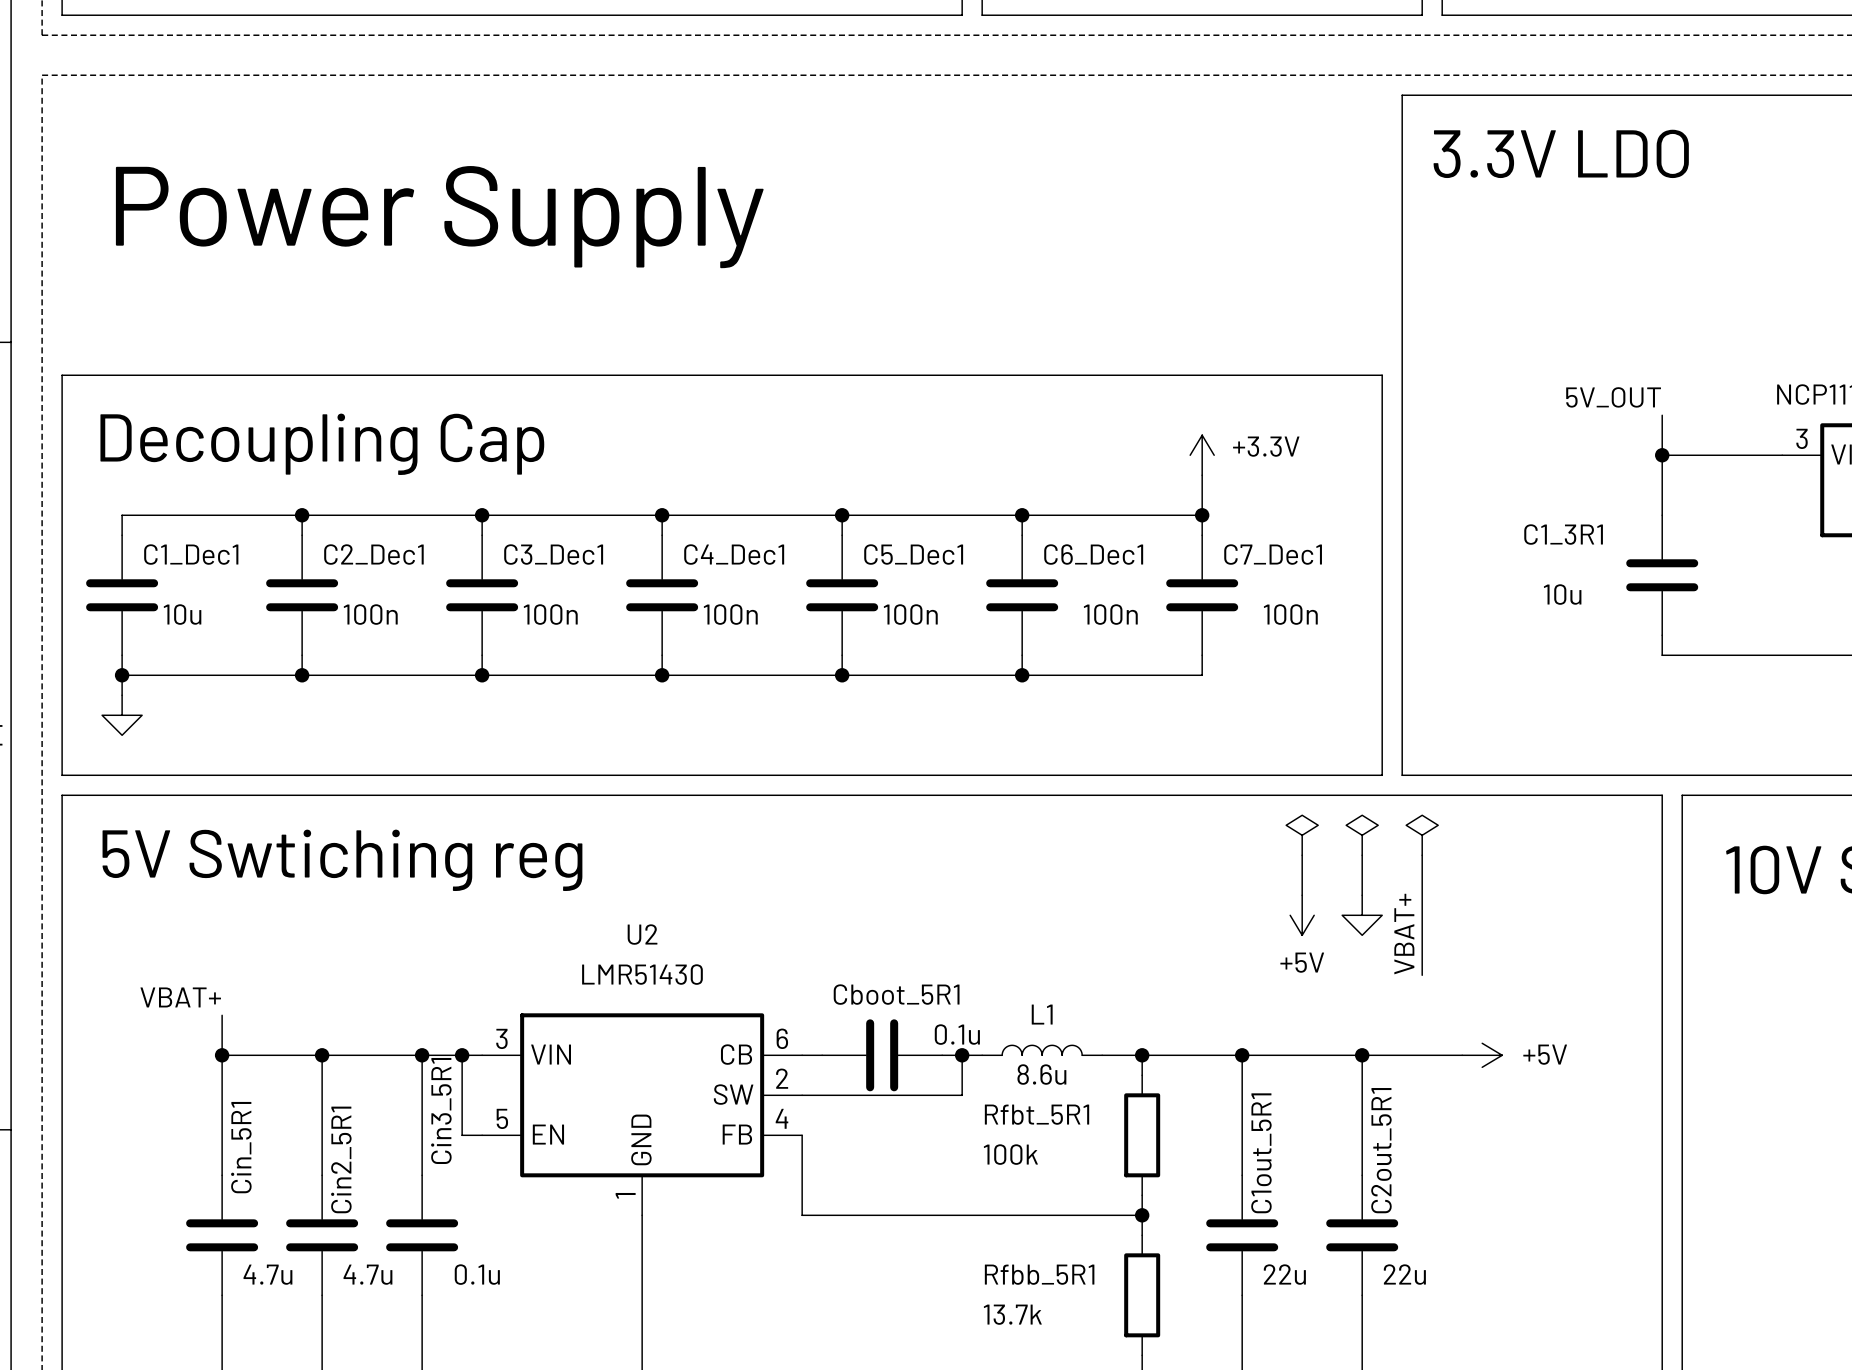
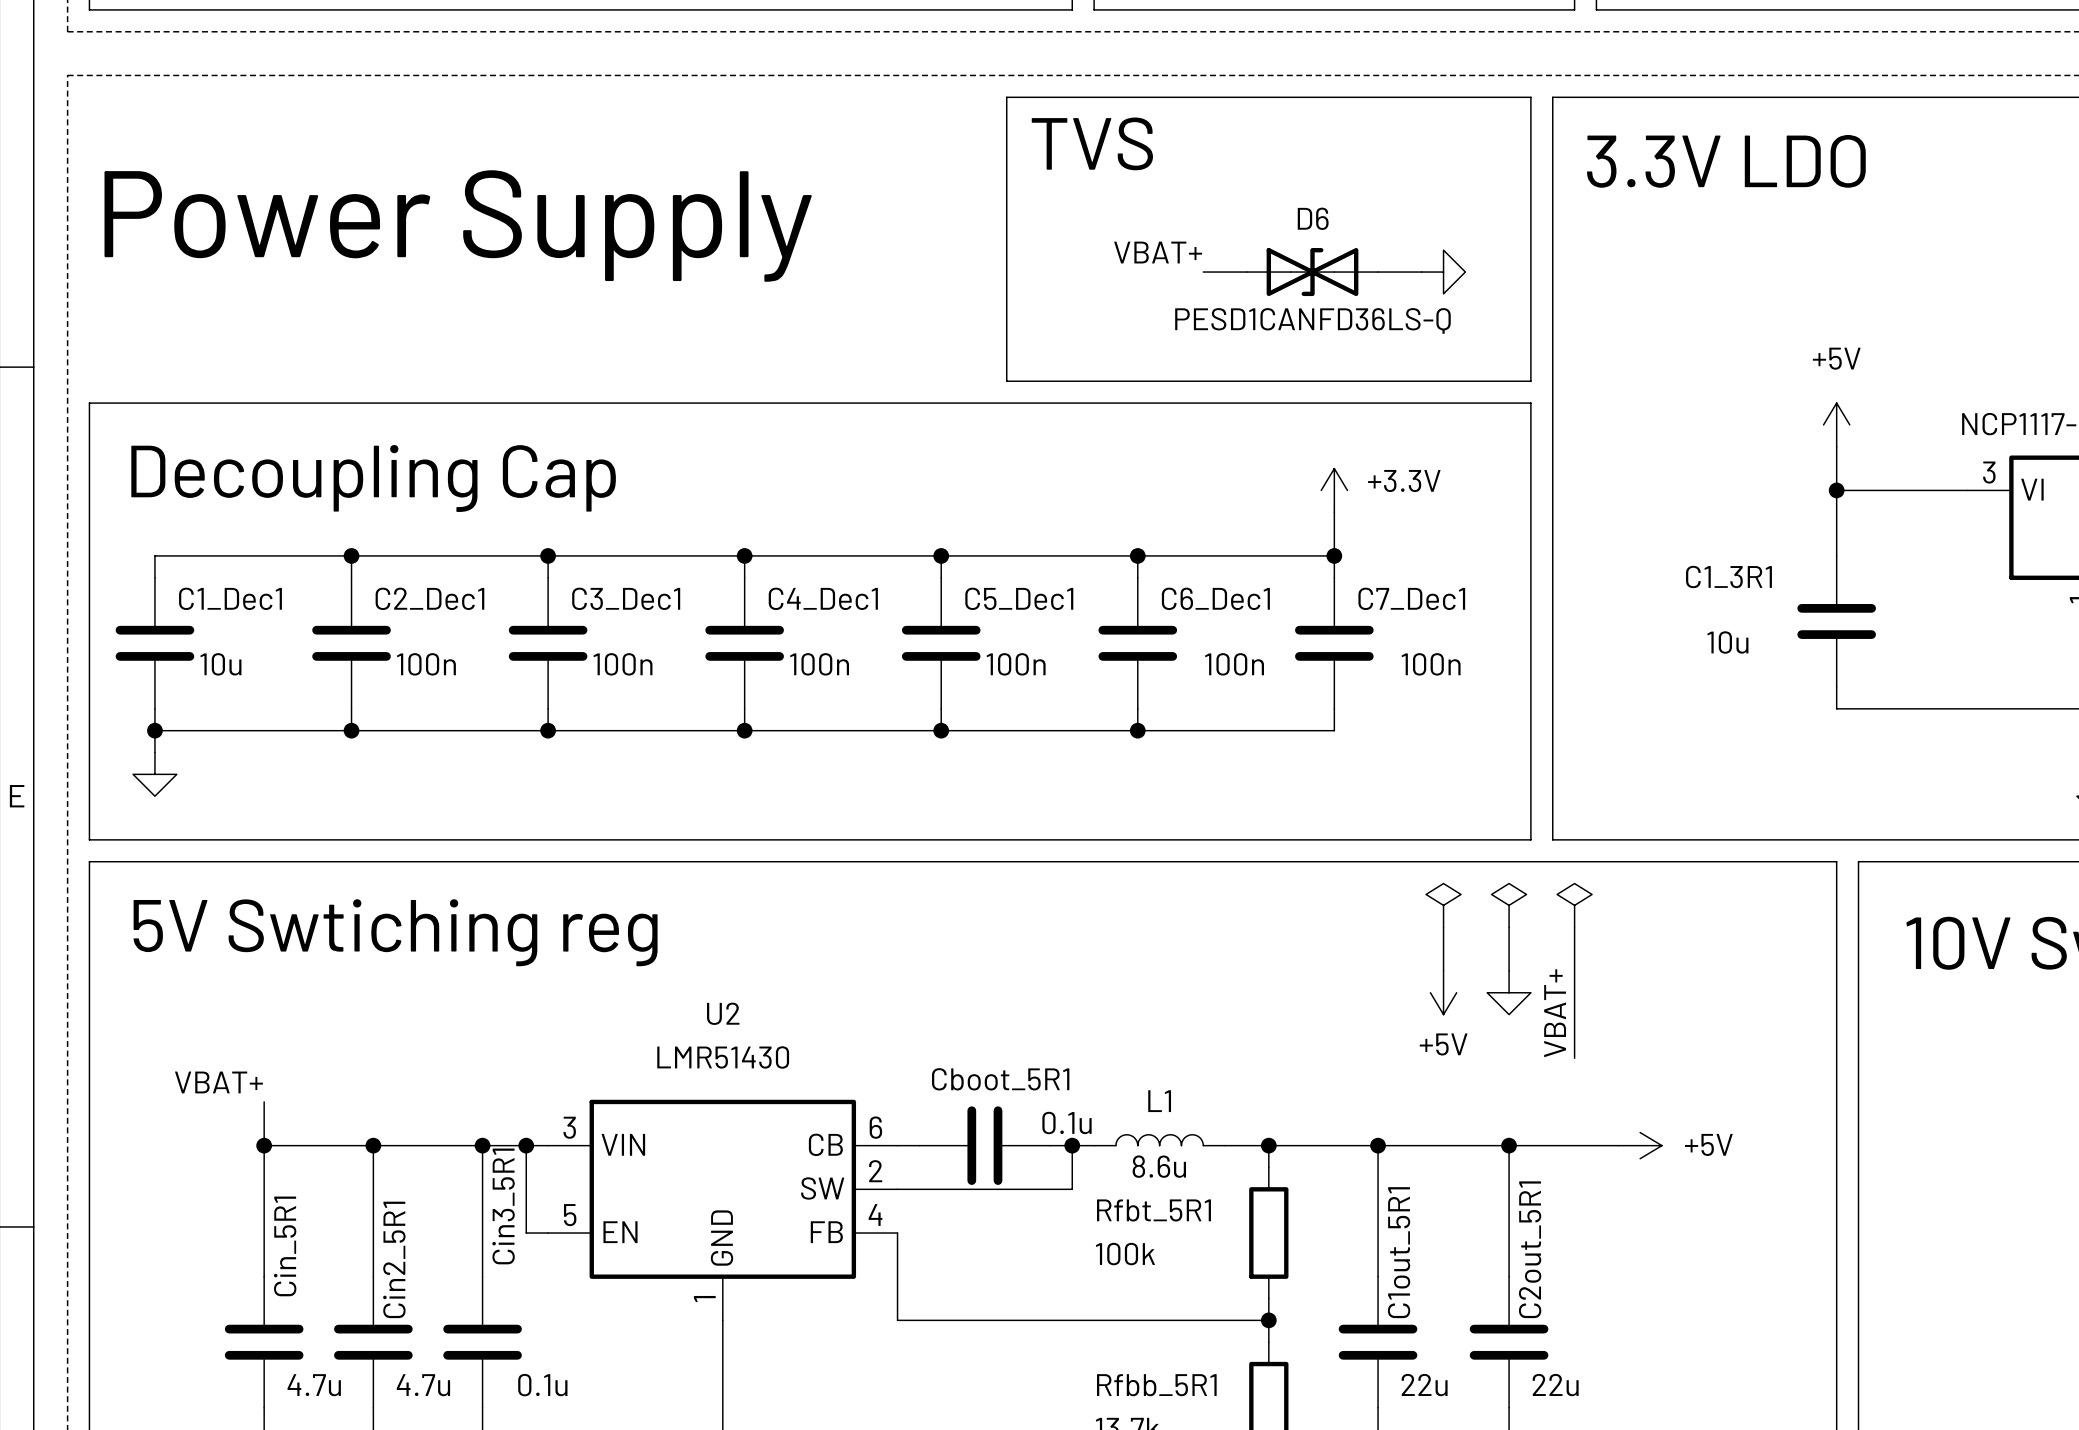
line: none -> (1006, 97) (1530, 97) (1530, 381) (1006, 381) (1006, 97)
text: none -> TVS (1092, 143)
text position: Power Supply (439, 217) -> Power Supply (458, 226)
label: none -> VBAT+ (1158, 252)
wire: none -> (1203, 272) (1246, 272)
D6: none -> PESD1CANFD36LS-Q (1312, 272)
wire: none -> (1378, 272) (1421, 272)
power symbol: none -> (1443, 272)
power symbol: none -> +5V (1836, 424)
label: 5V_OUT (1613, 397) -> none

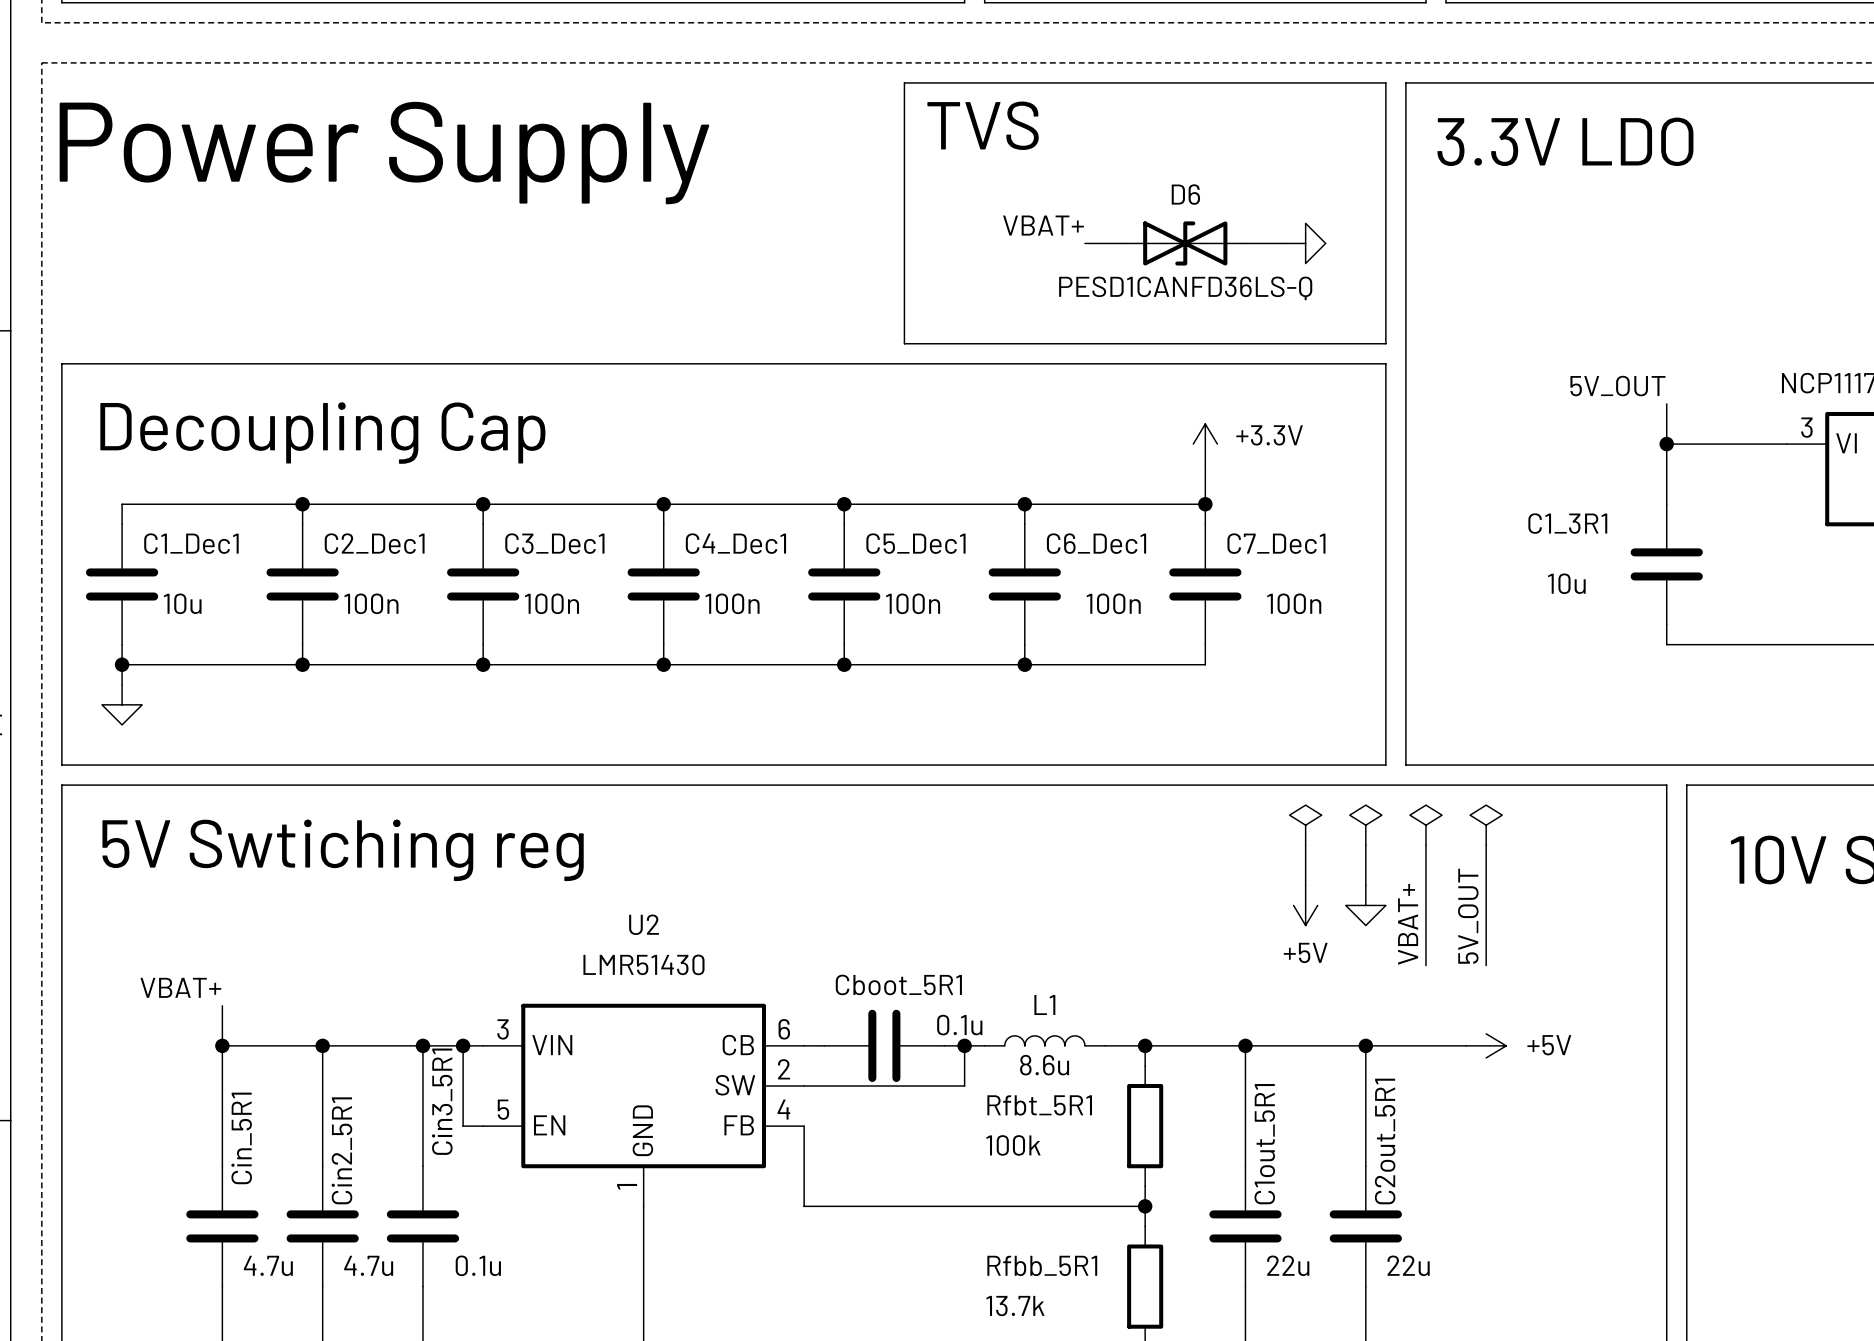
text position: Power Supply (458, 226) -> Power Supply (384, 153)
power symbol: +5V (1836, 424) -> none
label: none -> 5V_OUT (1617, 386)
power symbol: none -> (1486, 825)
wire: none -> (1486, 845) (1486, 965)
label: none -> 5V_OUT (1468, 916)

